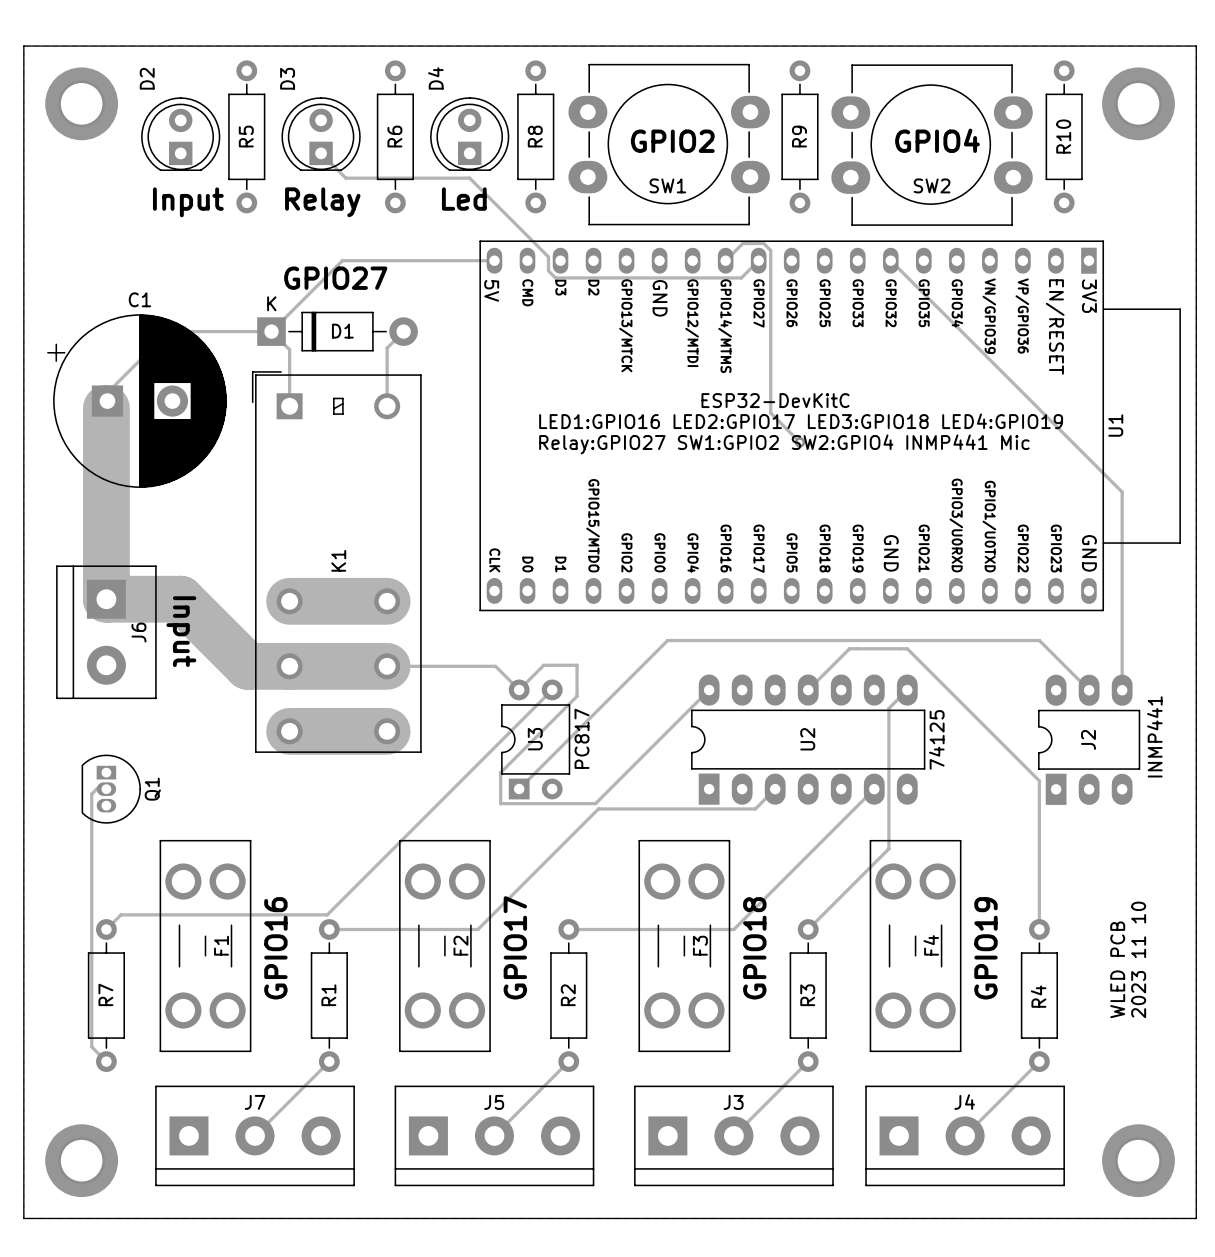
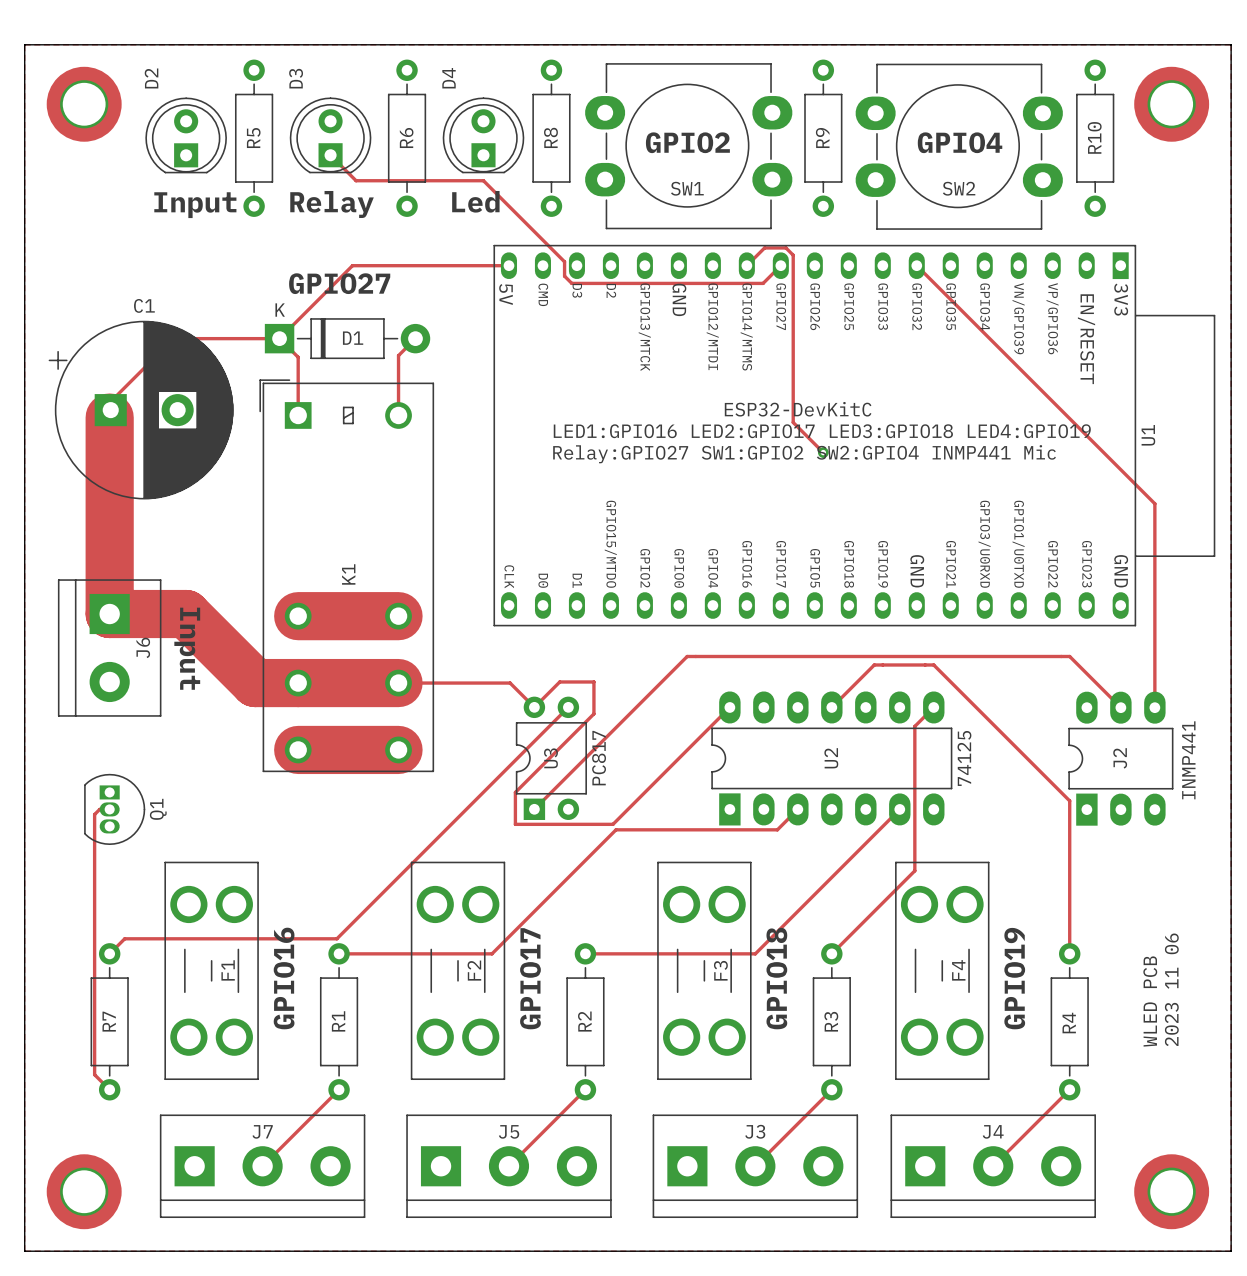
text: 2023 11 10 (1138, 959) -> 2023 11 06 (1171, 989)

